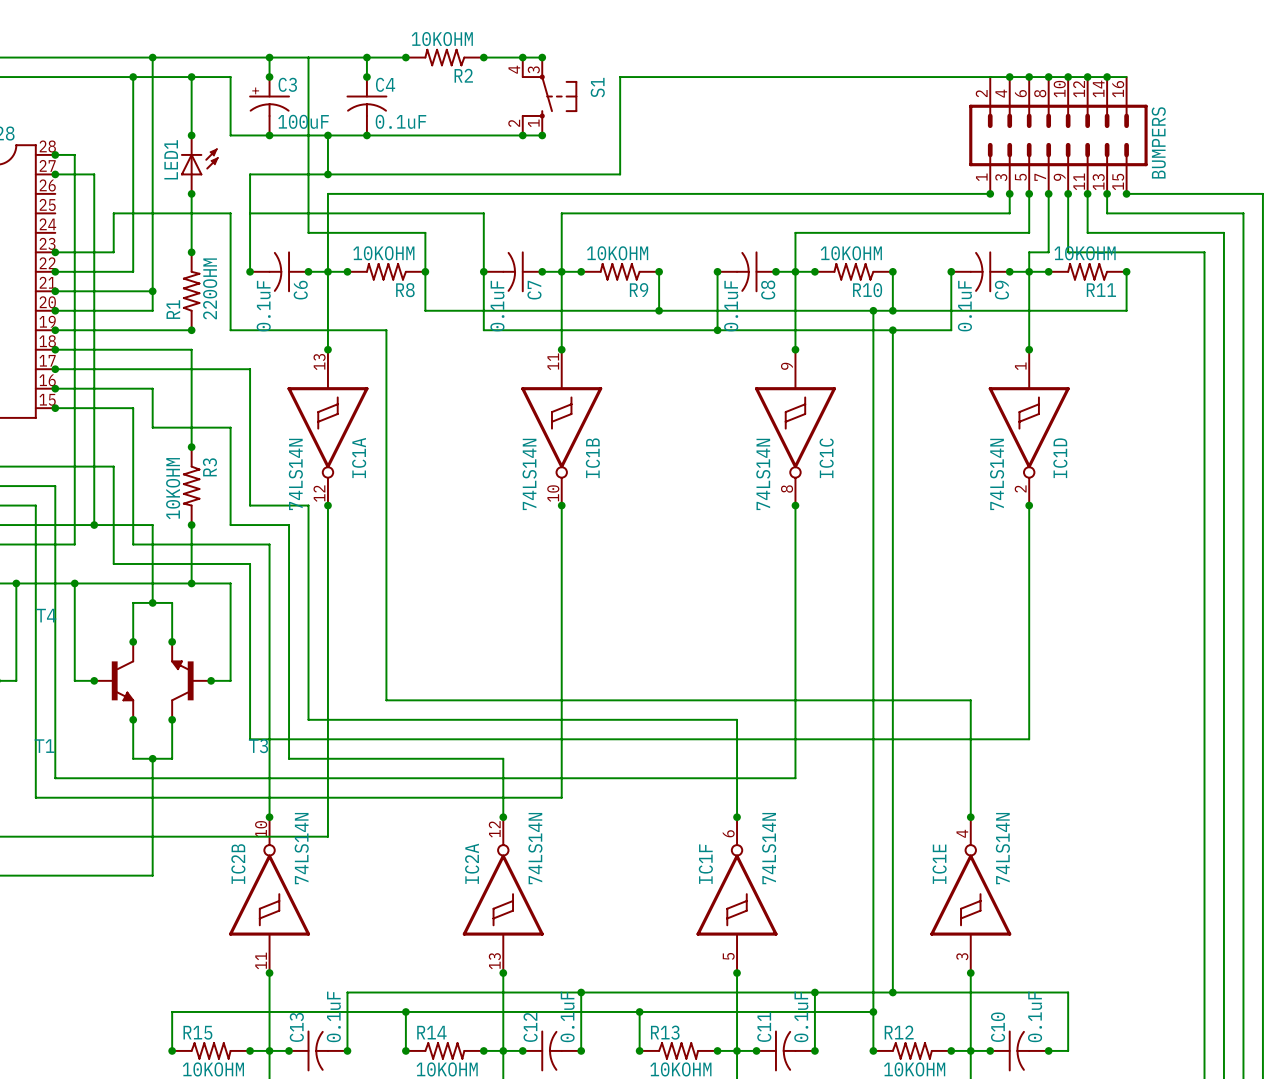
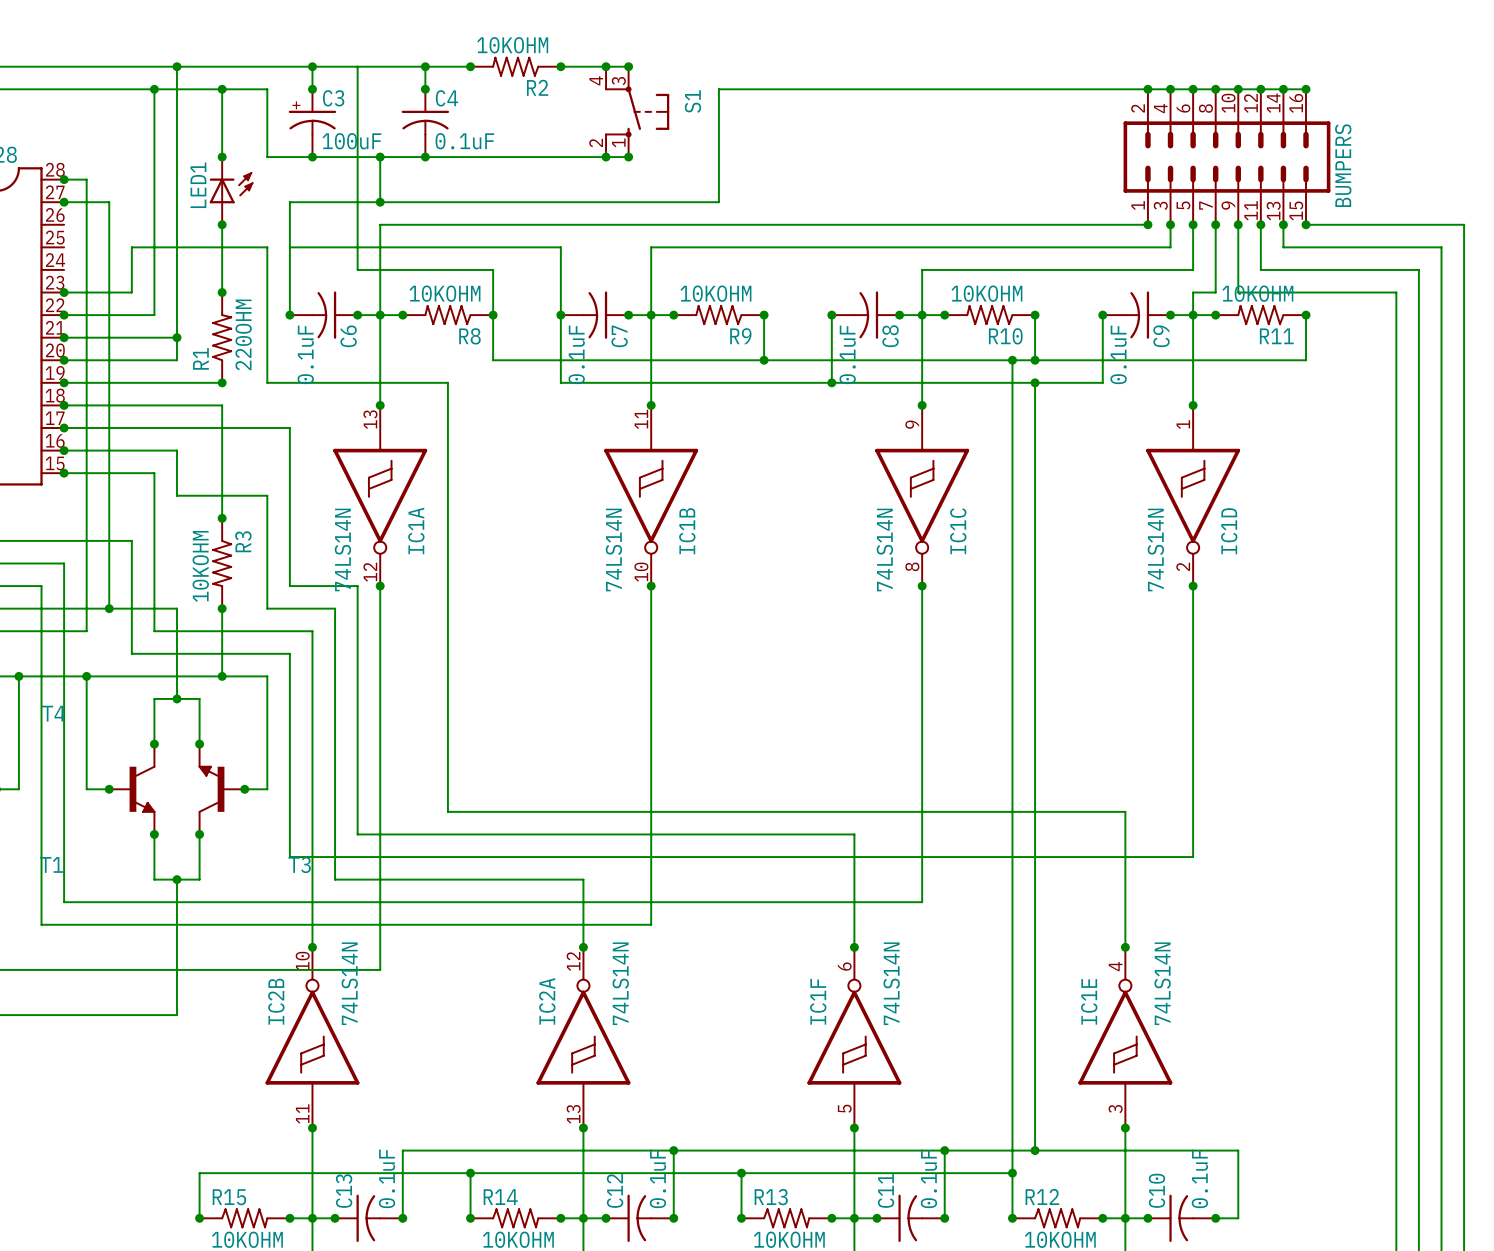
junction: none -> (1147, 89)
junction: none -> (1306, 89)

